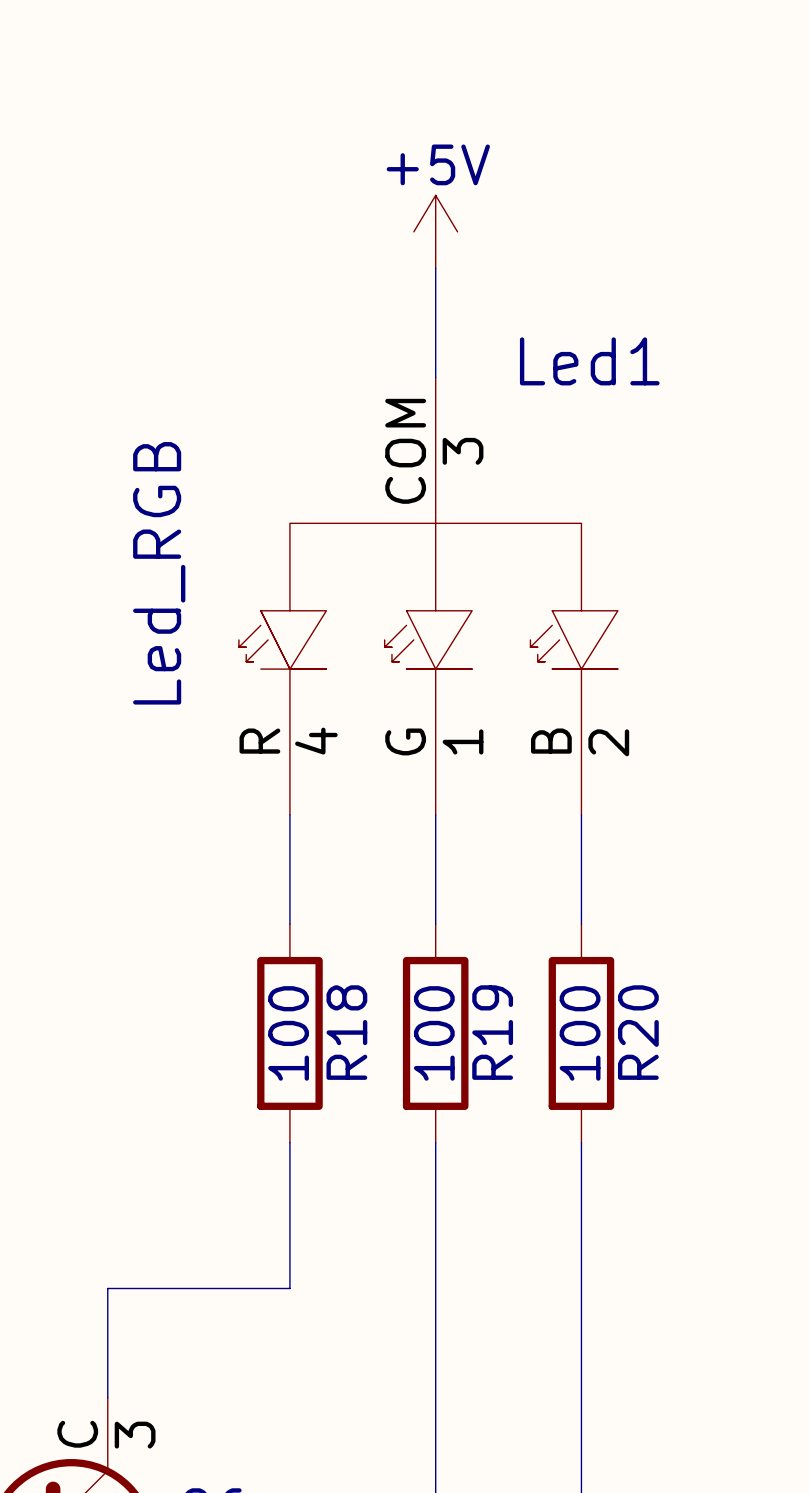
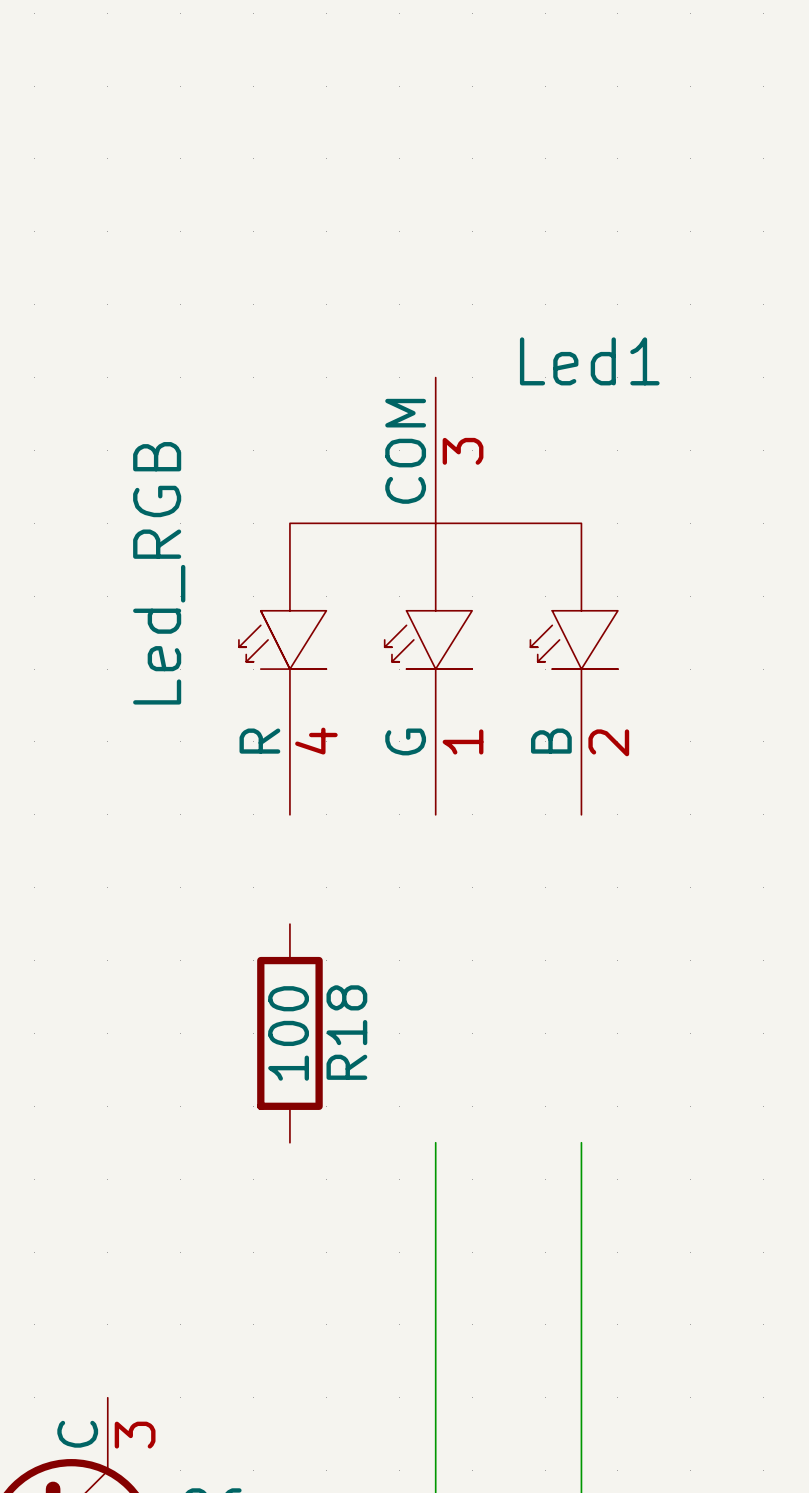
power symbol: +5V (435, 231) -> none
wire: (435, 268) (435, 377) -> none
wire: (289, 814) (289, 924) -> none
wire: (435, 814) (435, 924) -> none
wire: (581, 814) (581, 924) -> none
R19: 100 (435, 1033) -> none
R20: 100 (581, 1033) -> none
wire: (289, 1142) (289, 1288) (107, 1288) (107, 1397) -> none

